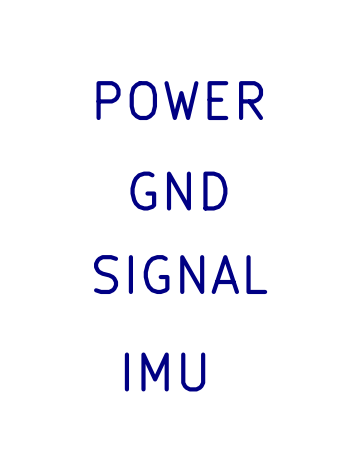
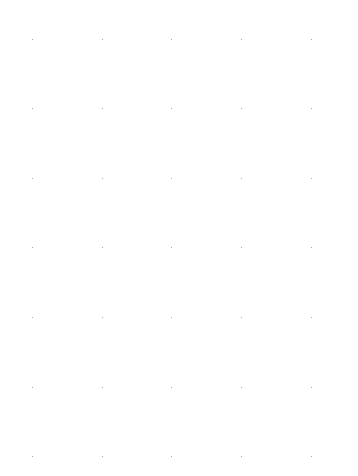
text: POWER (179, 100) -> none
text: GND (178, 191) -> none
text: SIGNAL (180, 274) -> none
text: IMU (165, 371) -> none

